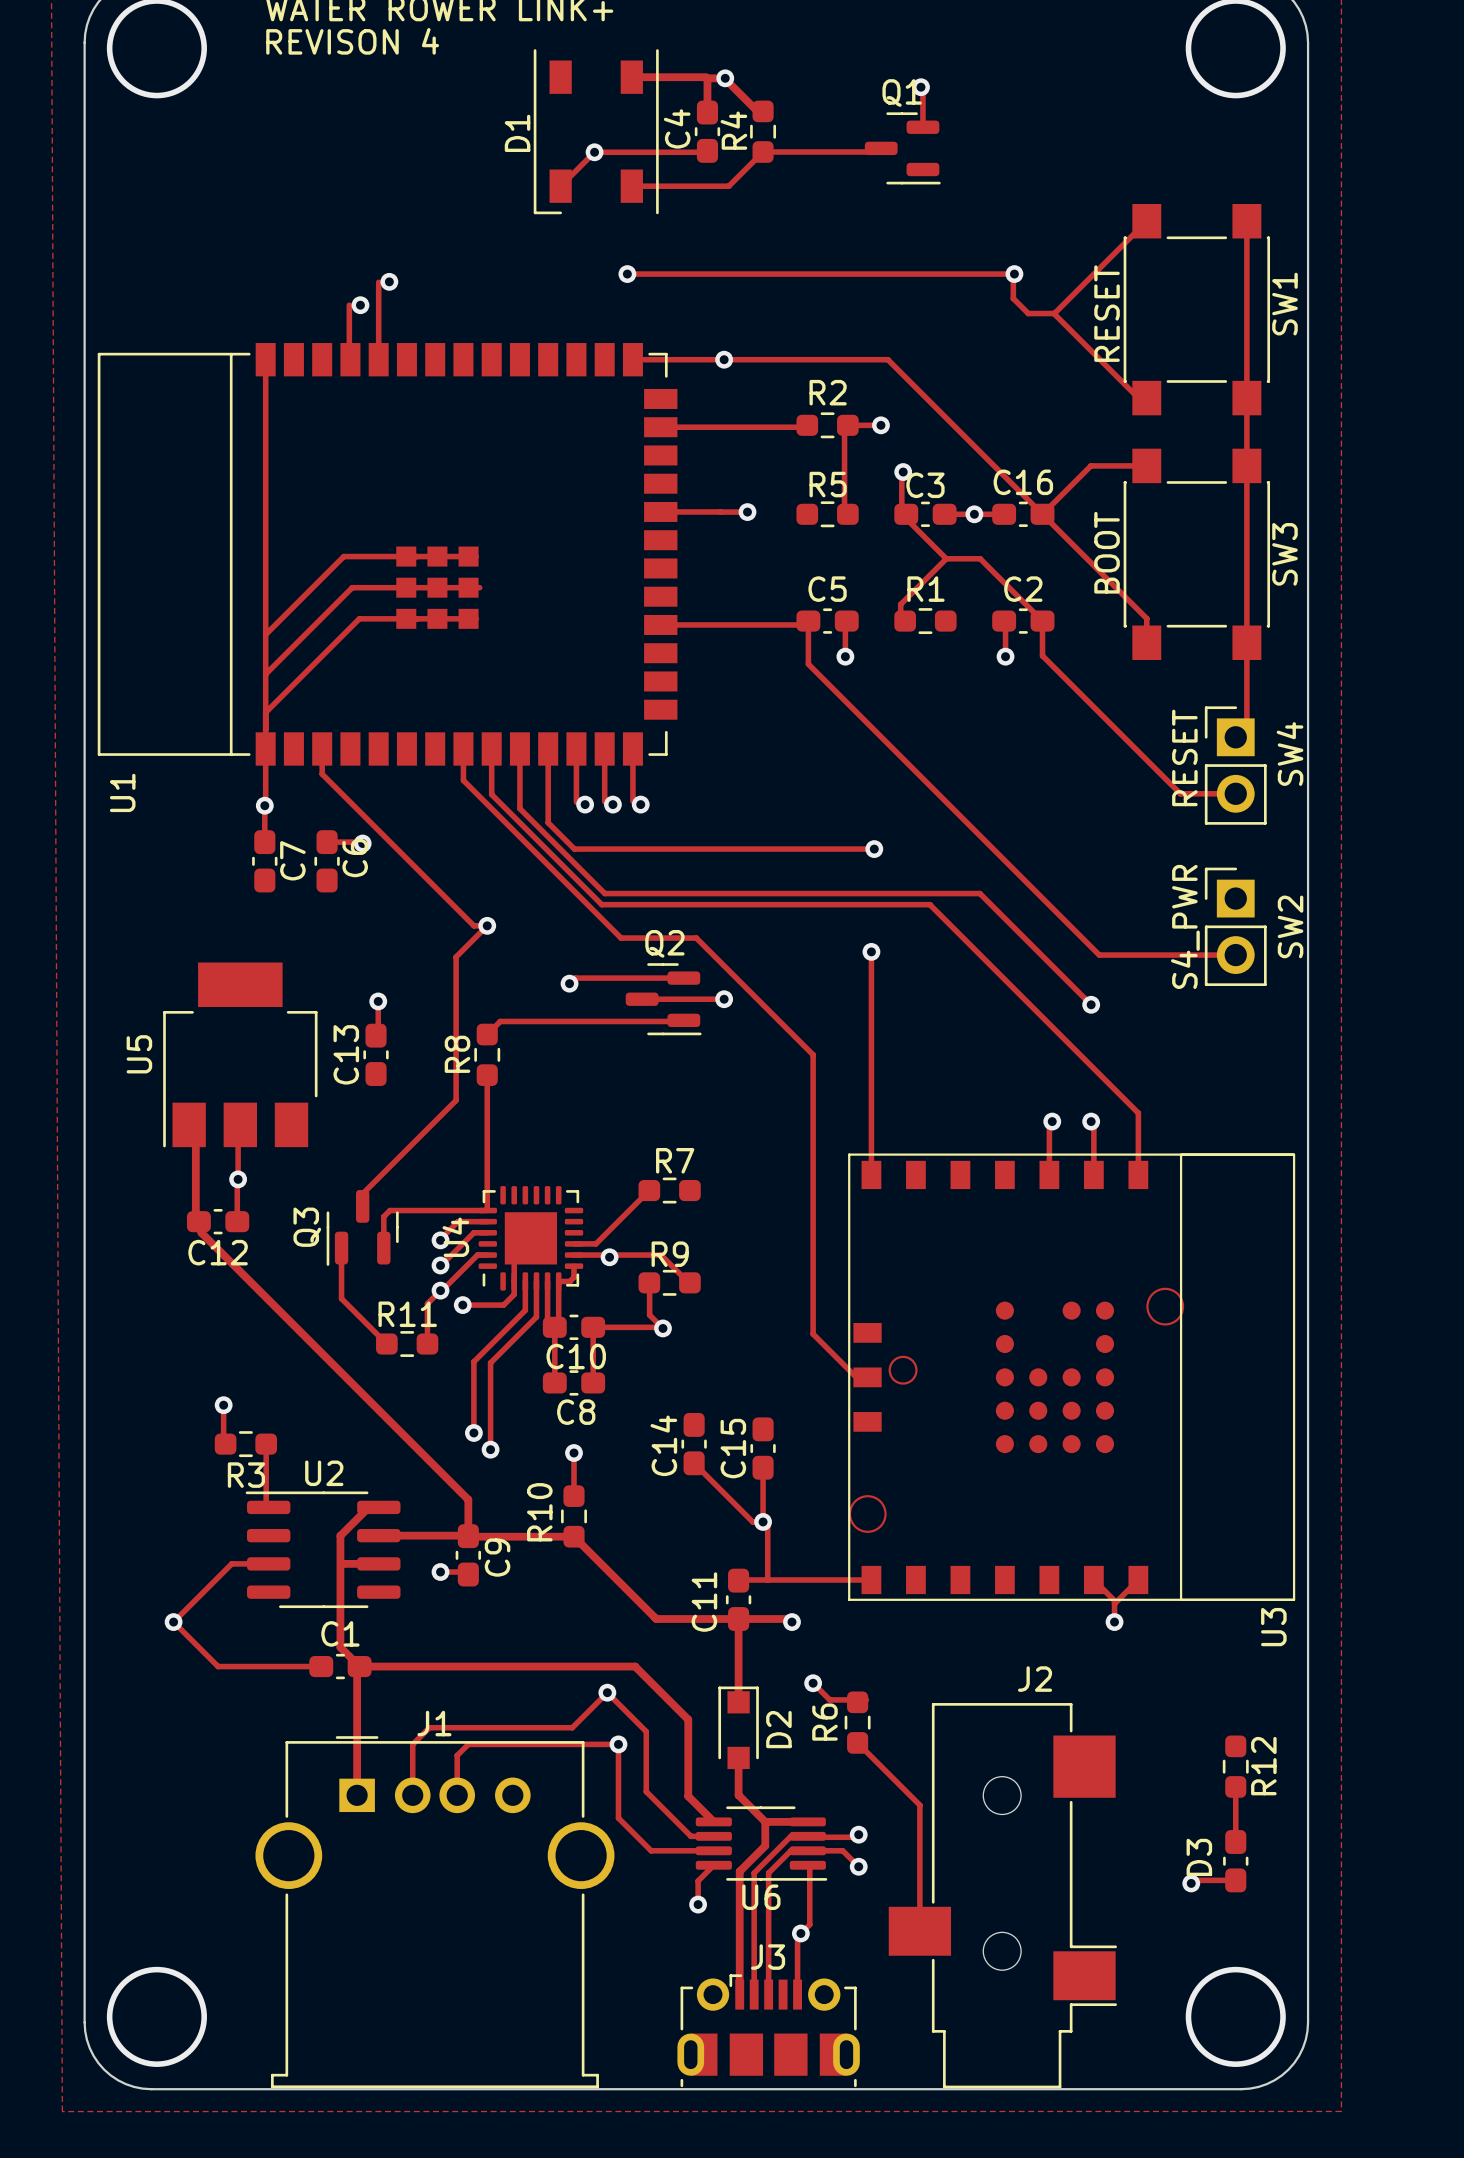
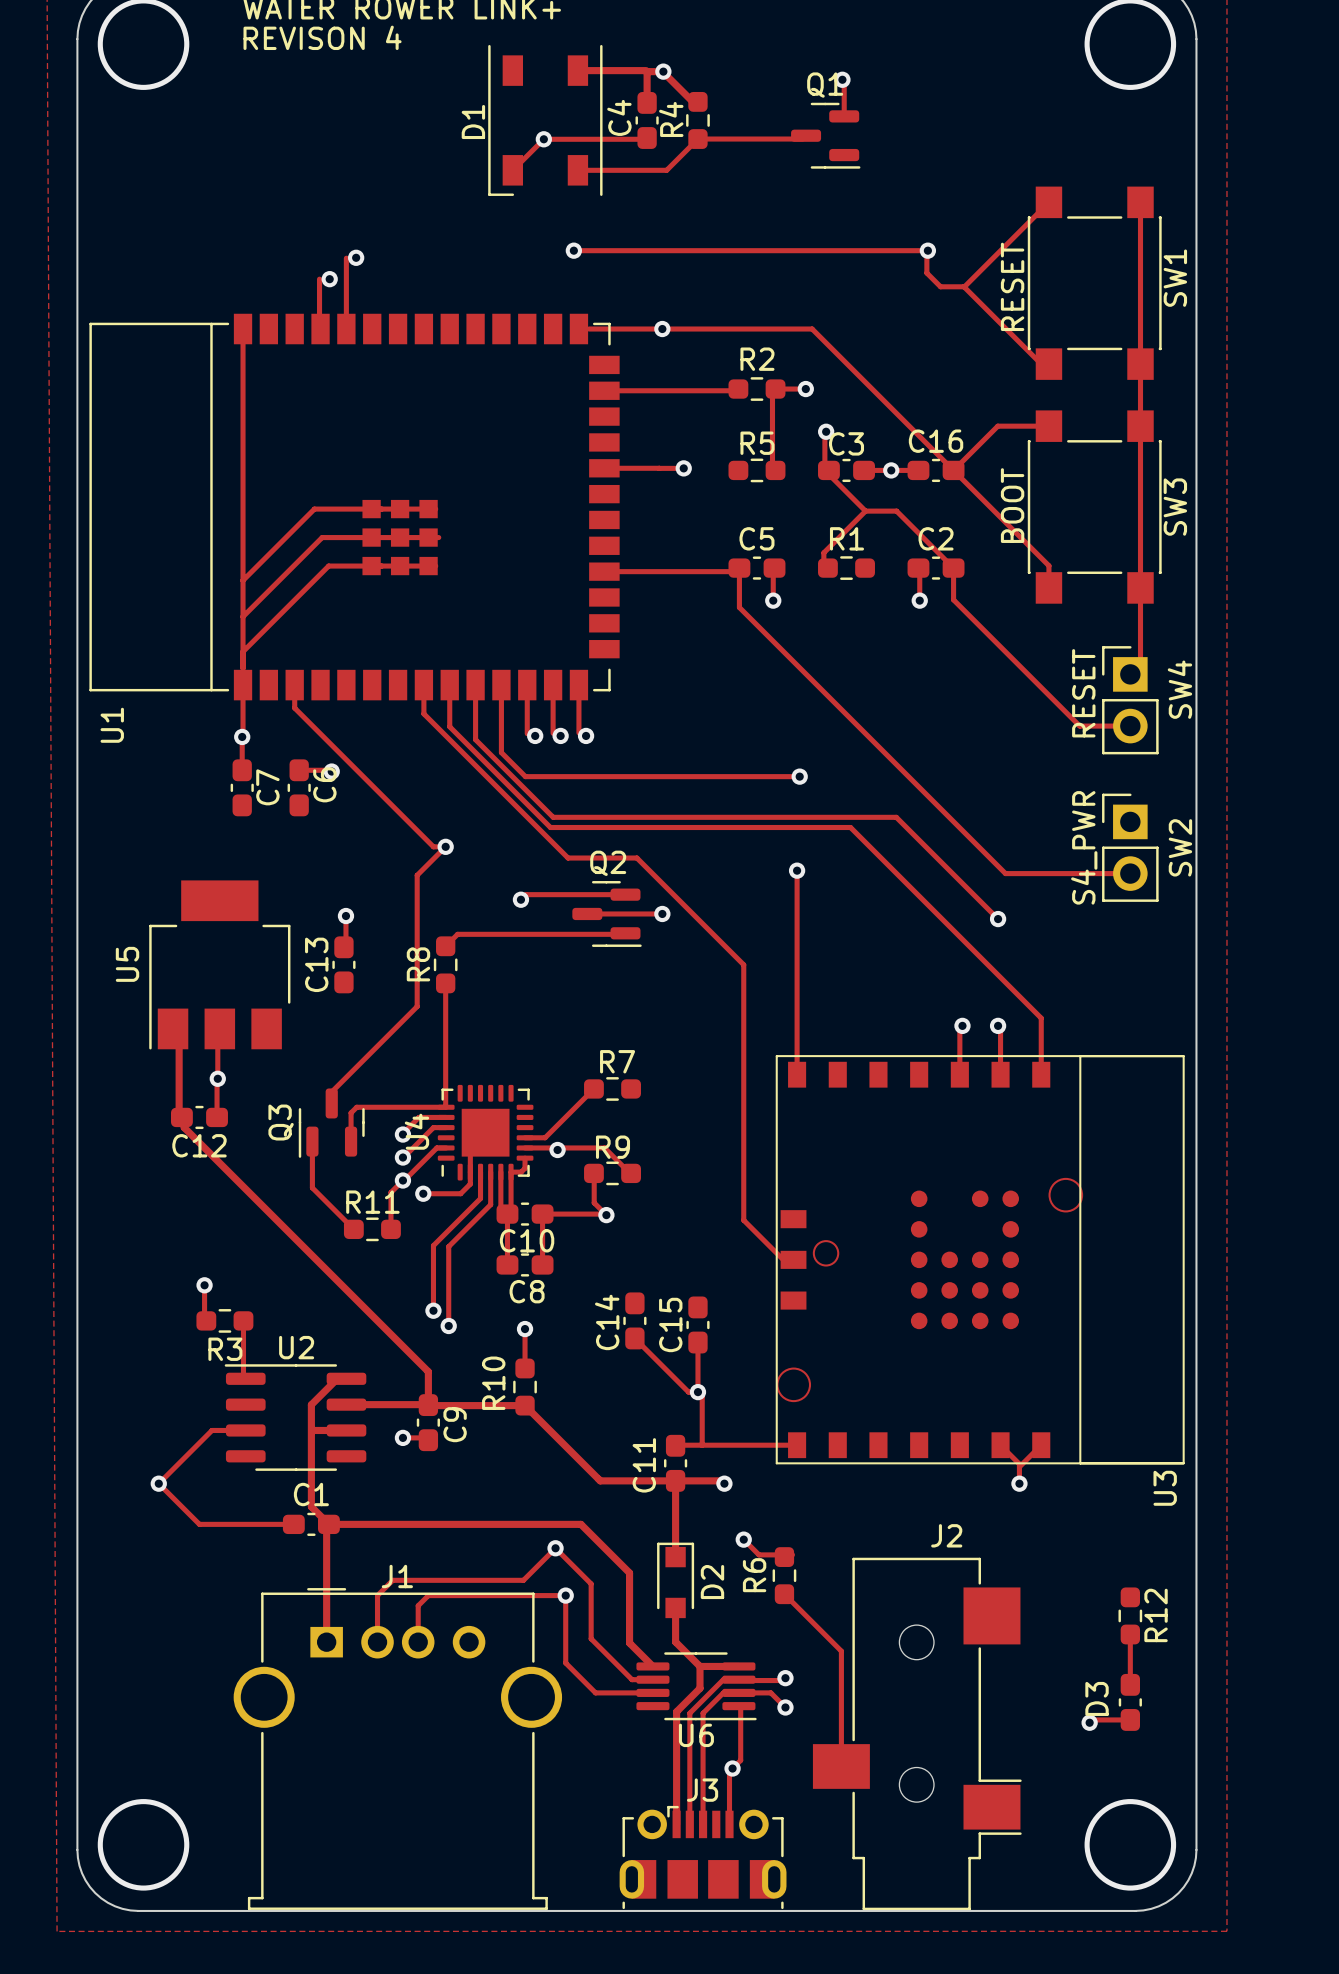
track: (713, 1865) (698, 1881) (698, 1904) -> none
via: (698, 1904) -> none

